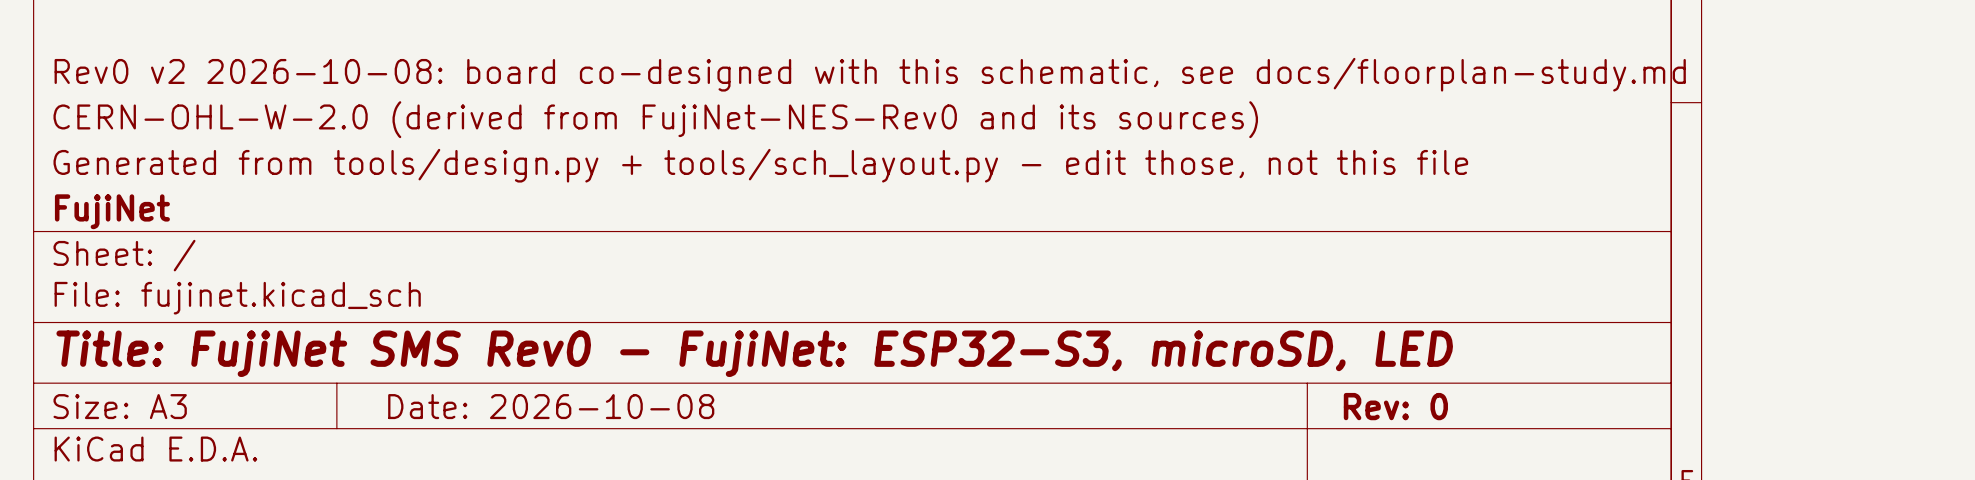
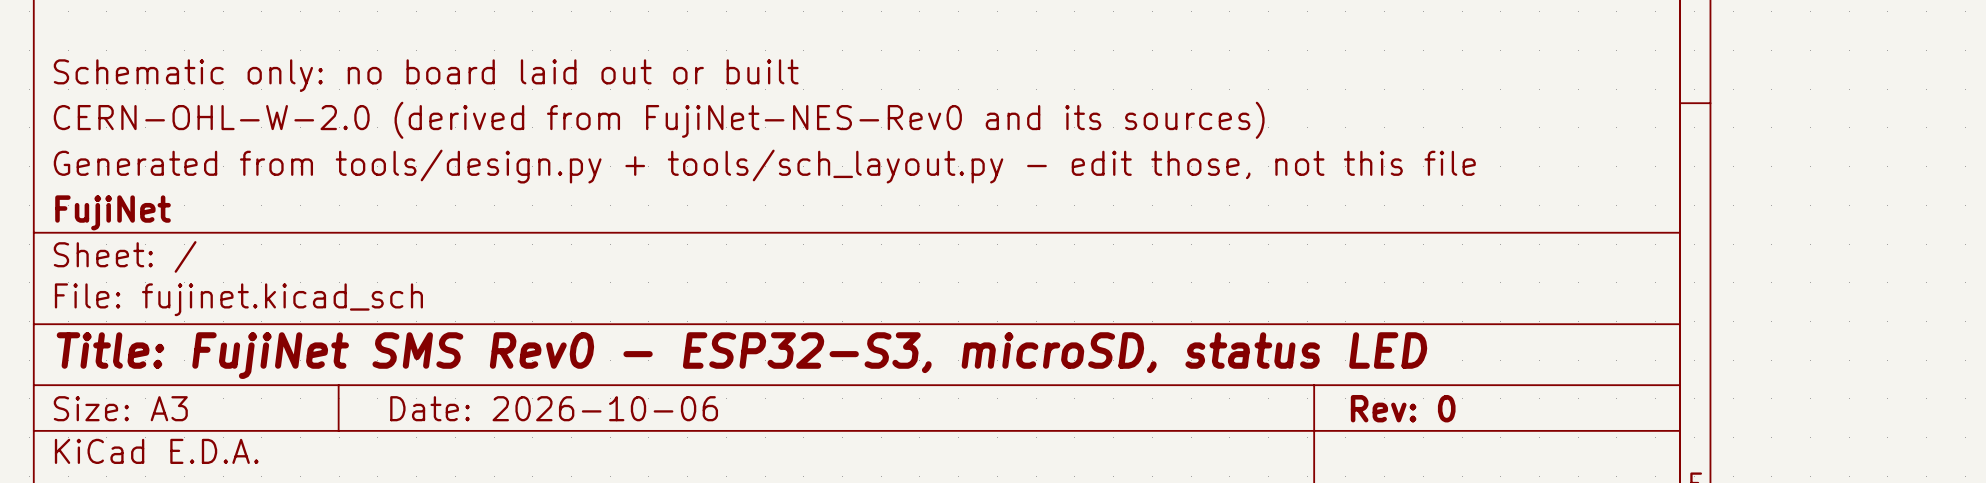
title block: Rev0 v2 2026-10-08: board co-designed with this schematic, see docs/floorplan-study.md (870, 74) -> Schematic only: no board laid out or built (426, 75)
title block: Title: FujiNet SMS Rev0 - FujiNet: ESP32-S3, microSD, LED (754, 353) -> Title: FujiNet SMS Rev0 - ESP32-S3, microSD, status LED (741, 355)
title block: Date: 2026-10-08 (551, 406) -> Date: 2026-10-06 (554, 408)

